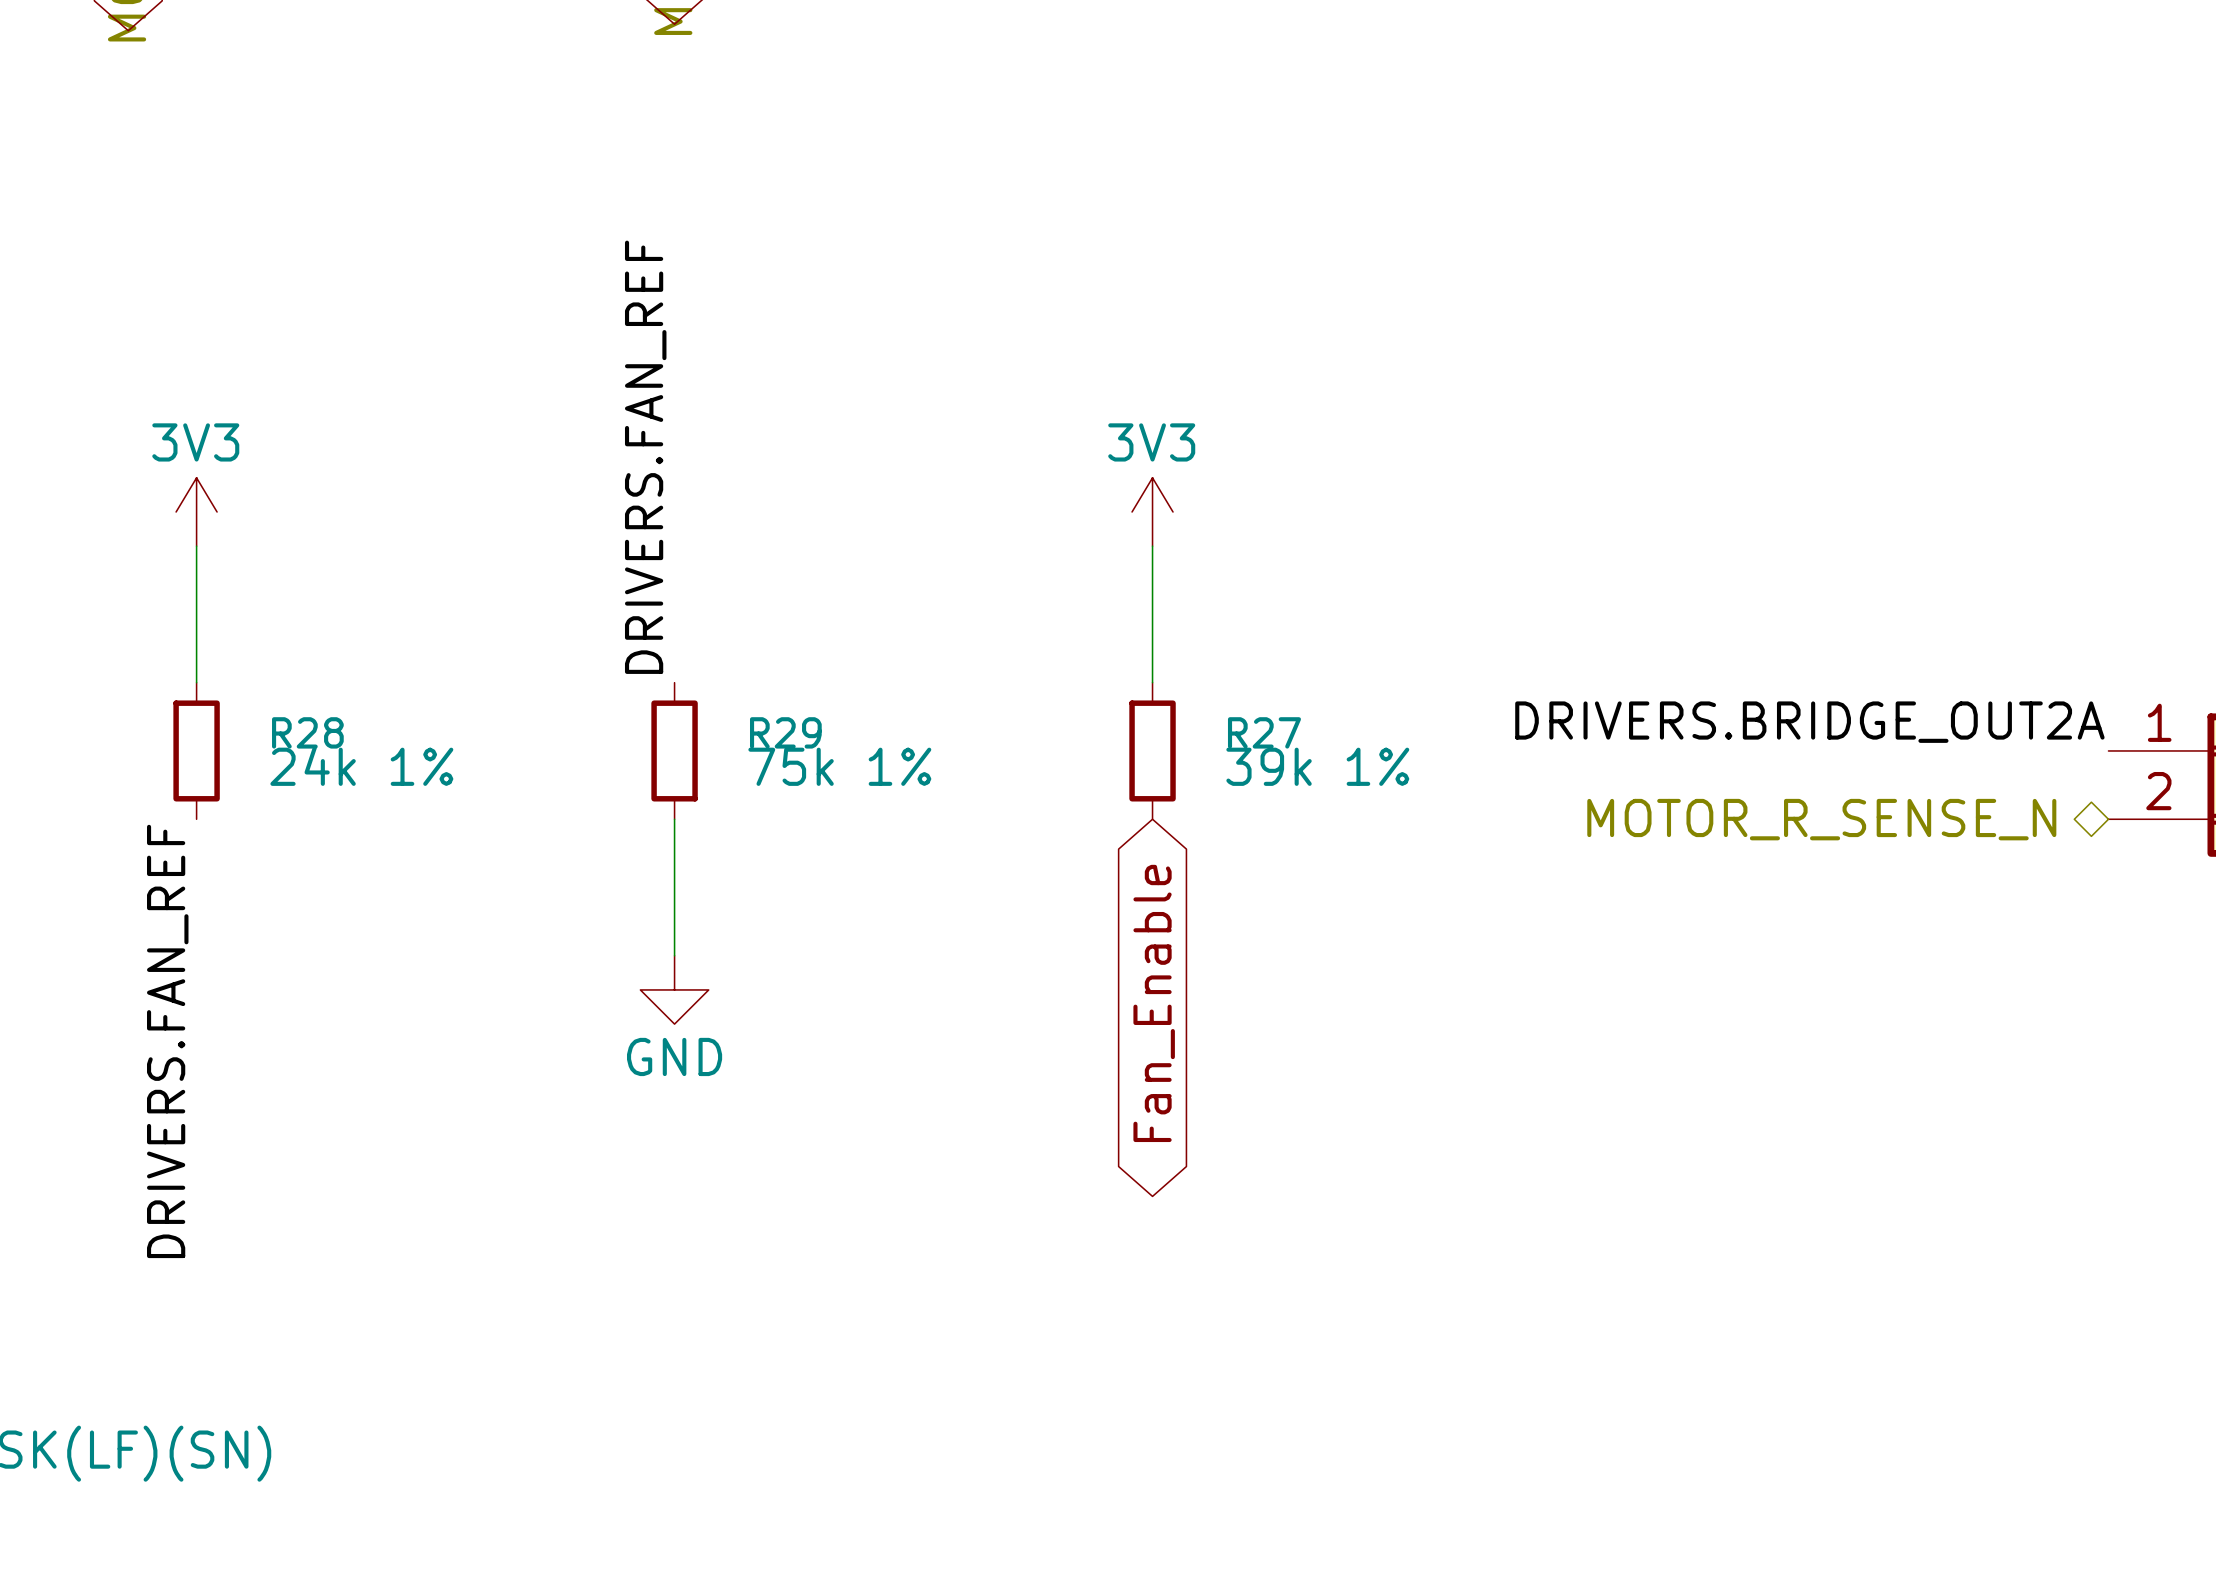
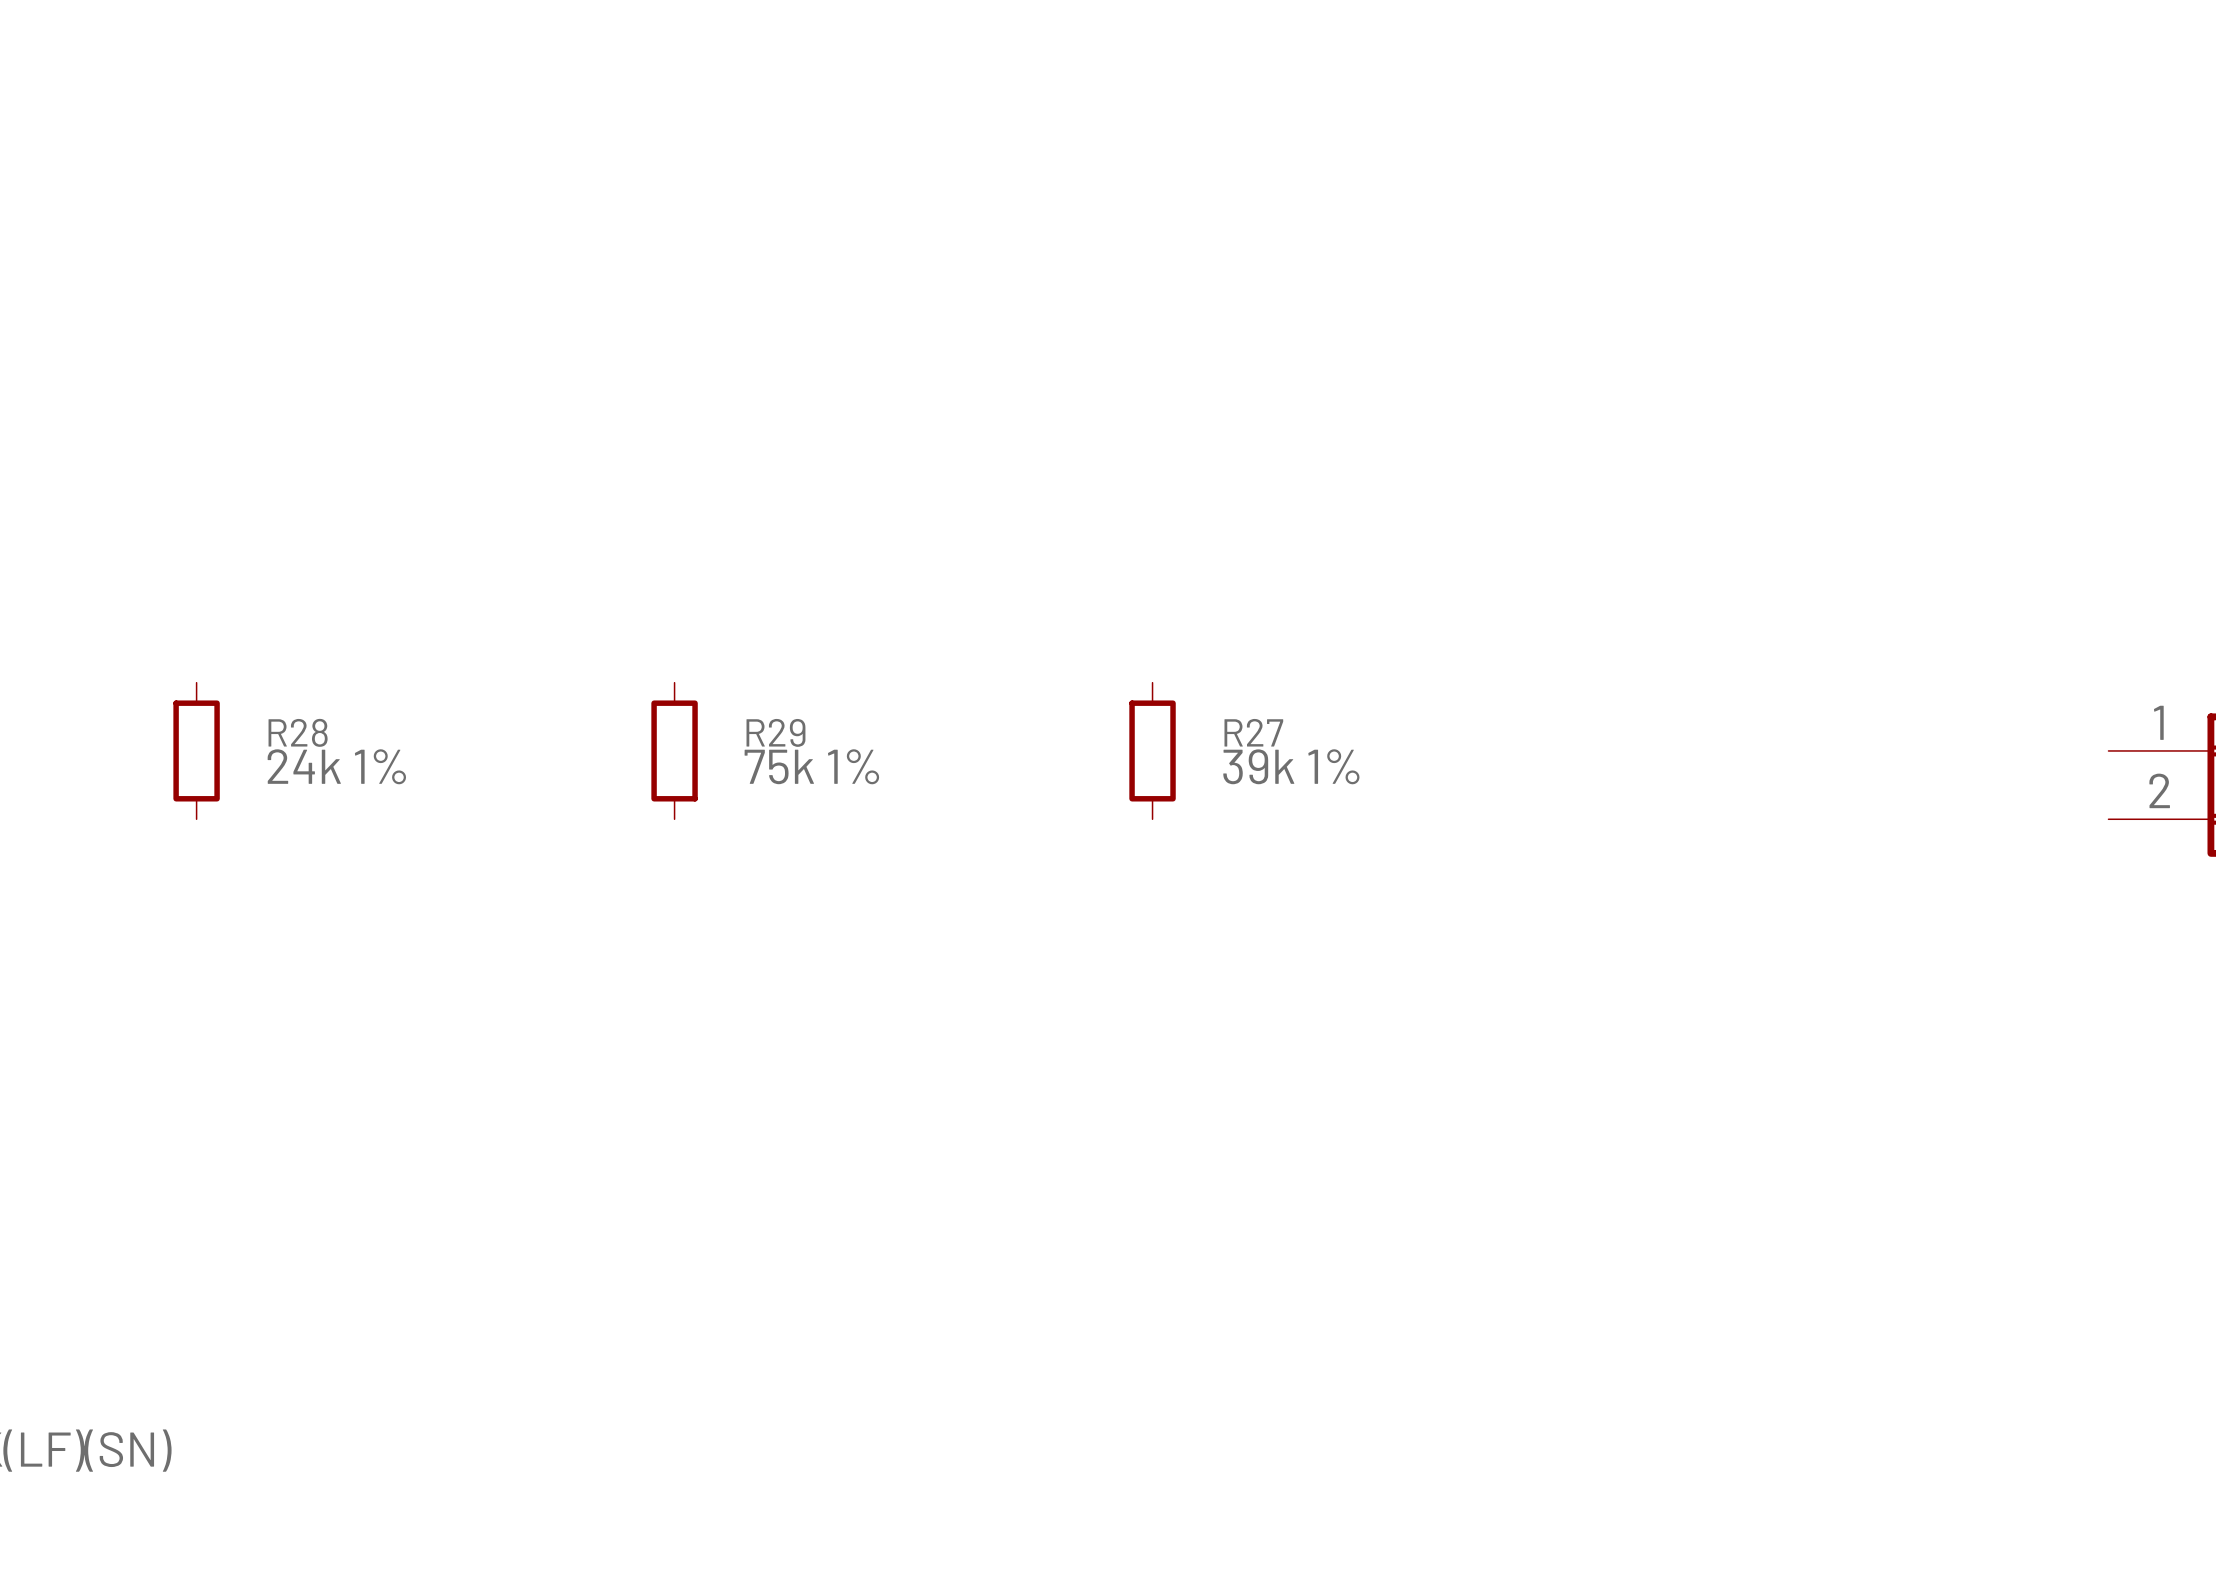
label: DRIVERS.FAN_REF (645, 457) -> none
power symbol: 3V3 (196, 511) -> none
power symbol: 3V3 (1152, 511) -> none
wire: (196, 546) (196, 682) -> none
wire: (1152, 546) (1152, 682) -> none
label: DRIVERS.BRIDGE_OUT2A (1809, 722) -> none
wire: (674, 819) (674, 955) -> none
hierarchical label: MOTOR_R_SENSE_N (1821, 819) -> none
power symbol: GND (674, 989) -> none
global label: Fan_Enable (1154, 1003) -> none
label: DRIVERS.FAN_REF (167, 1041) -> none

